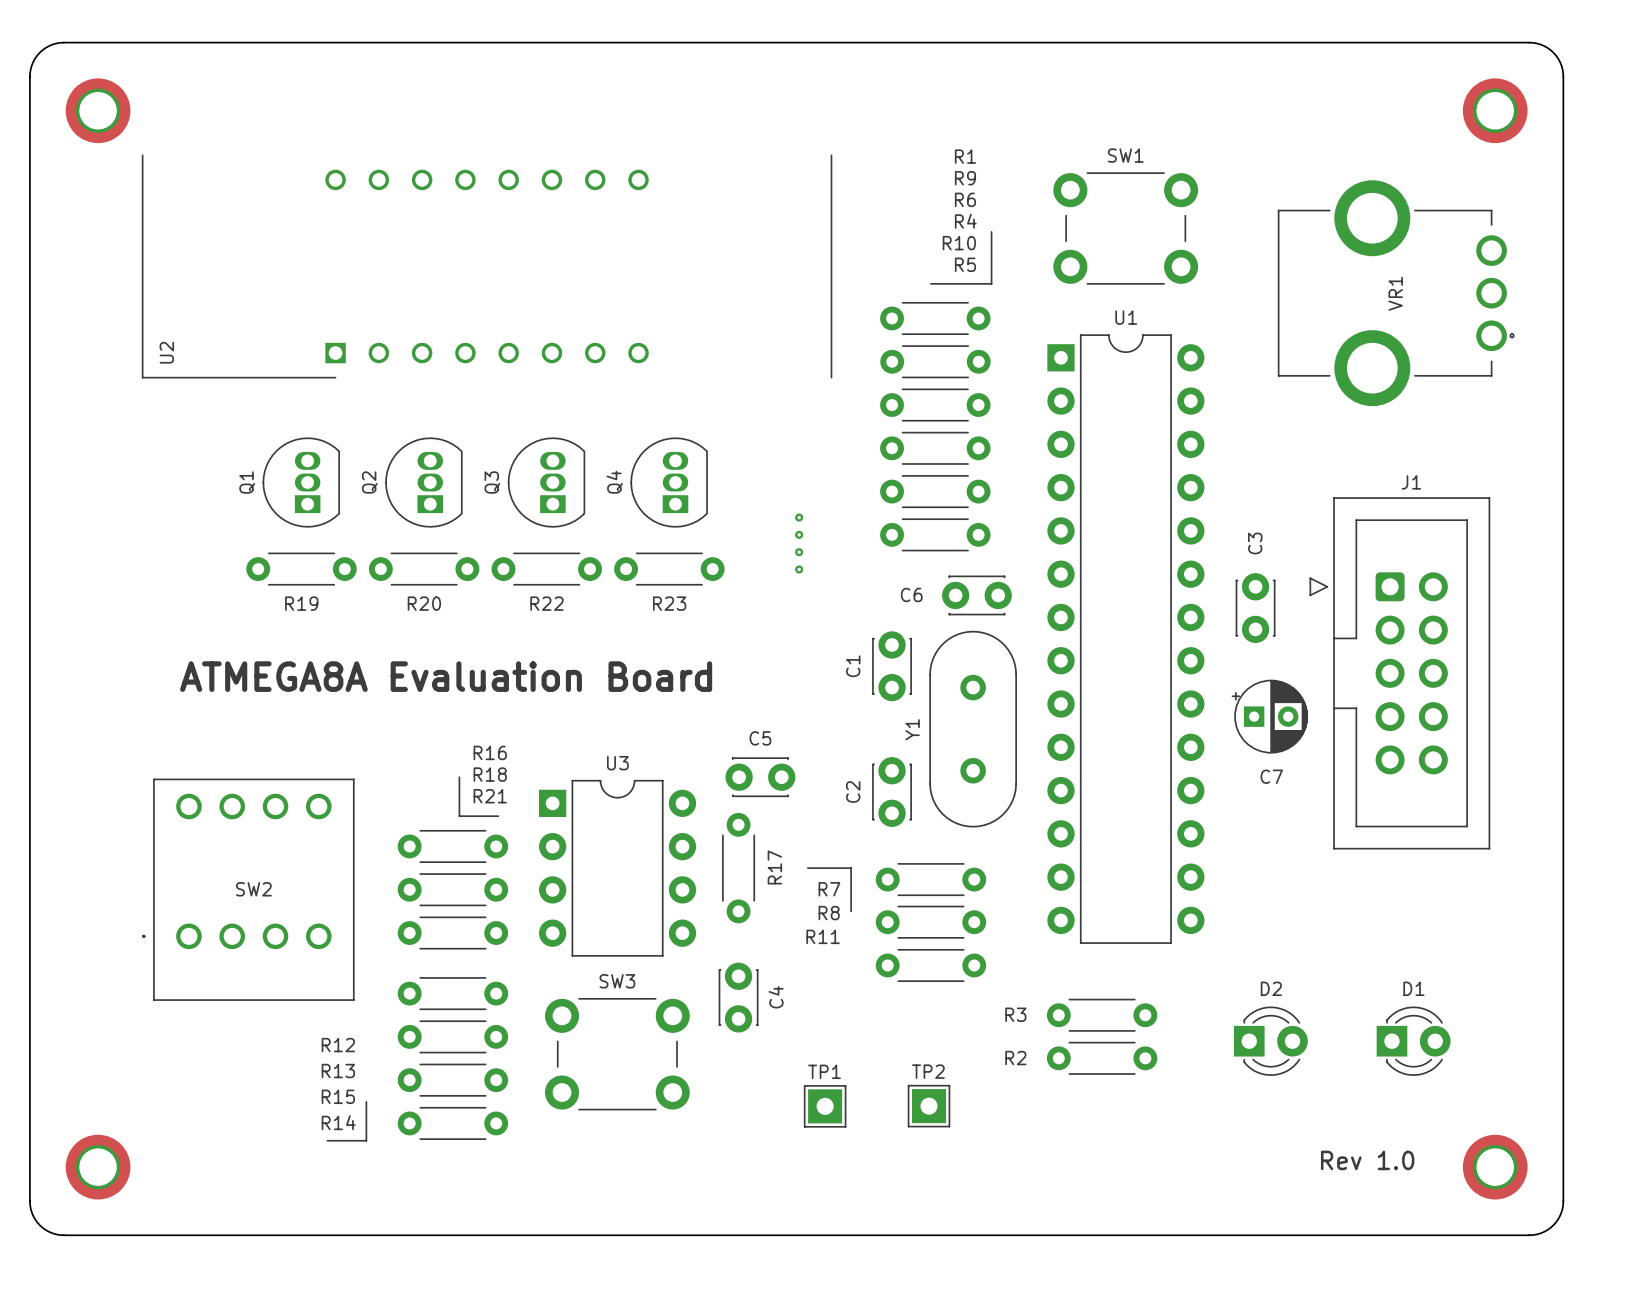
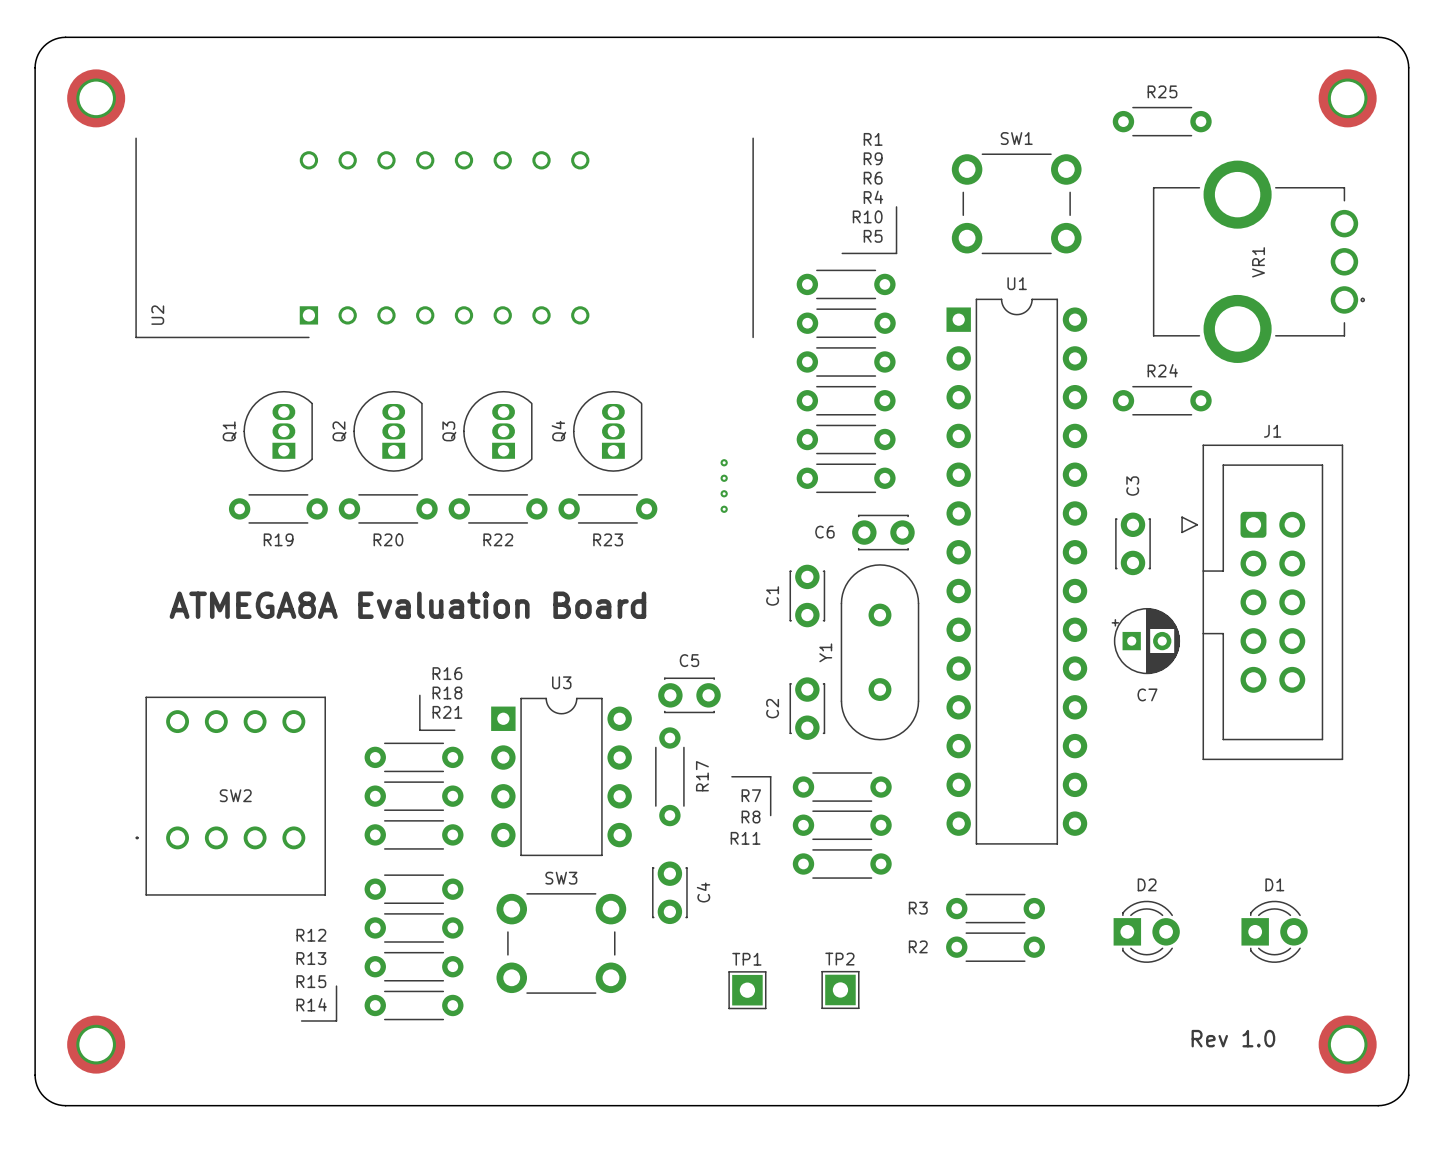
R25: none -> (1162, 121)
R24: none -> (1162, 400)

